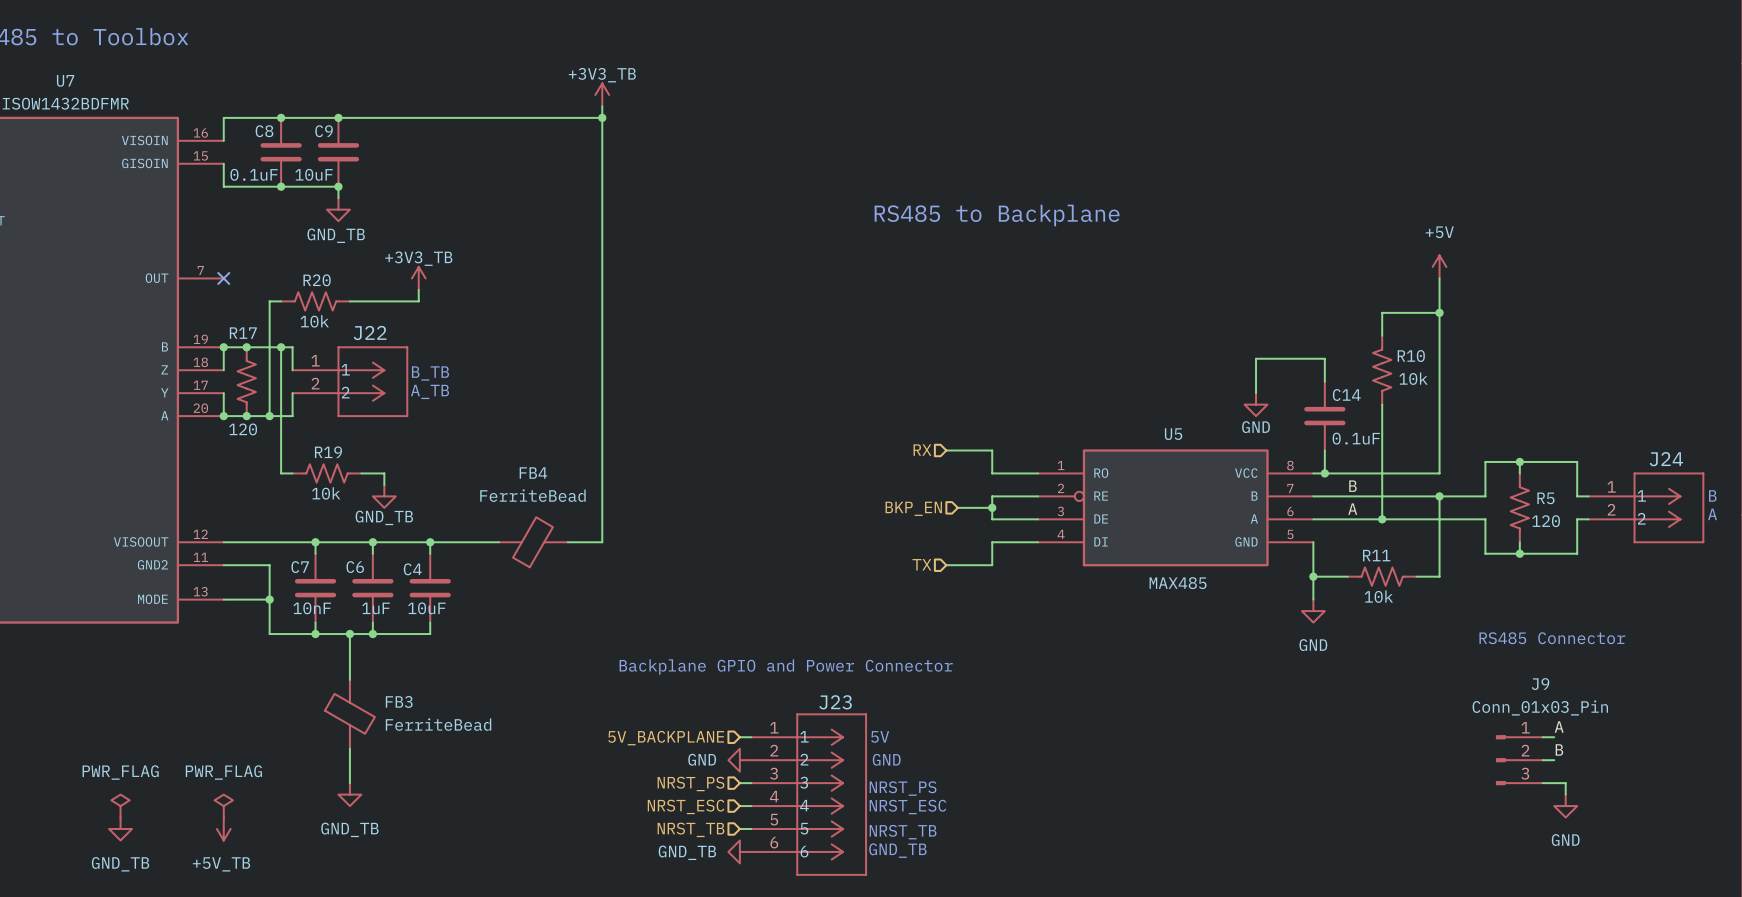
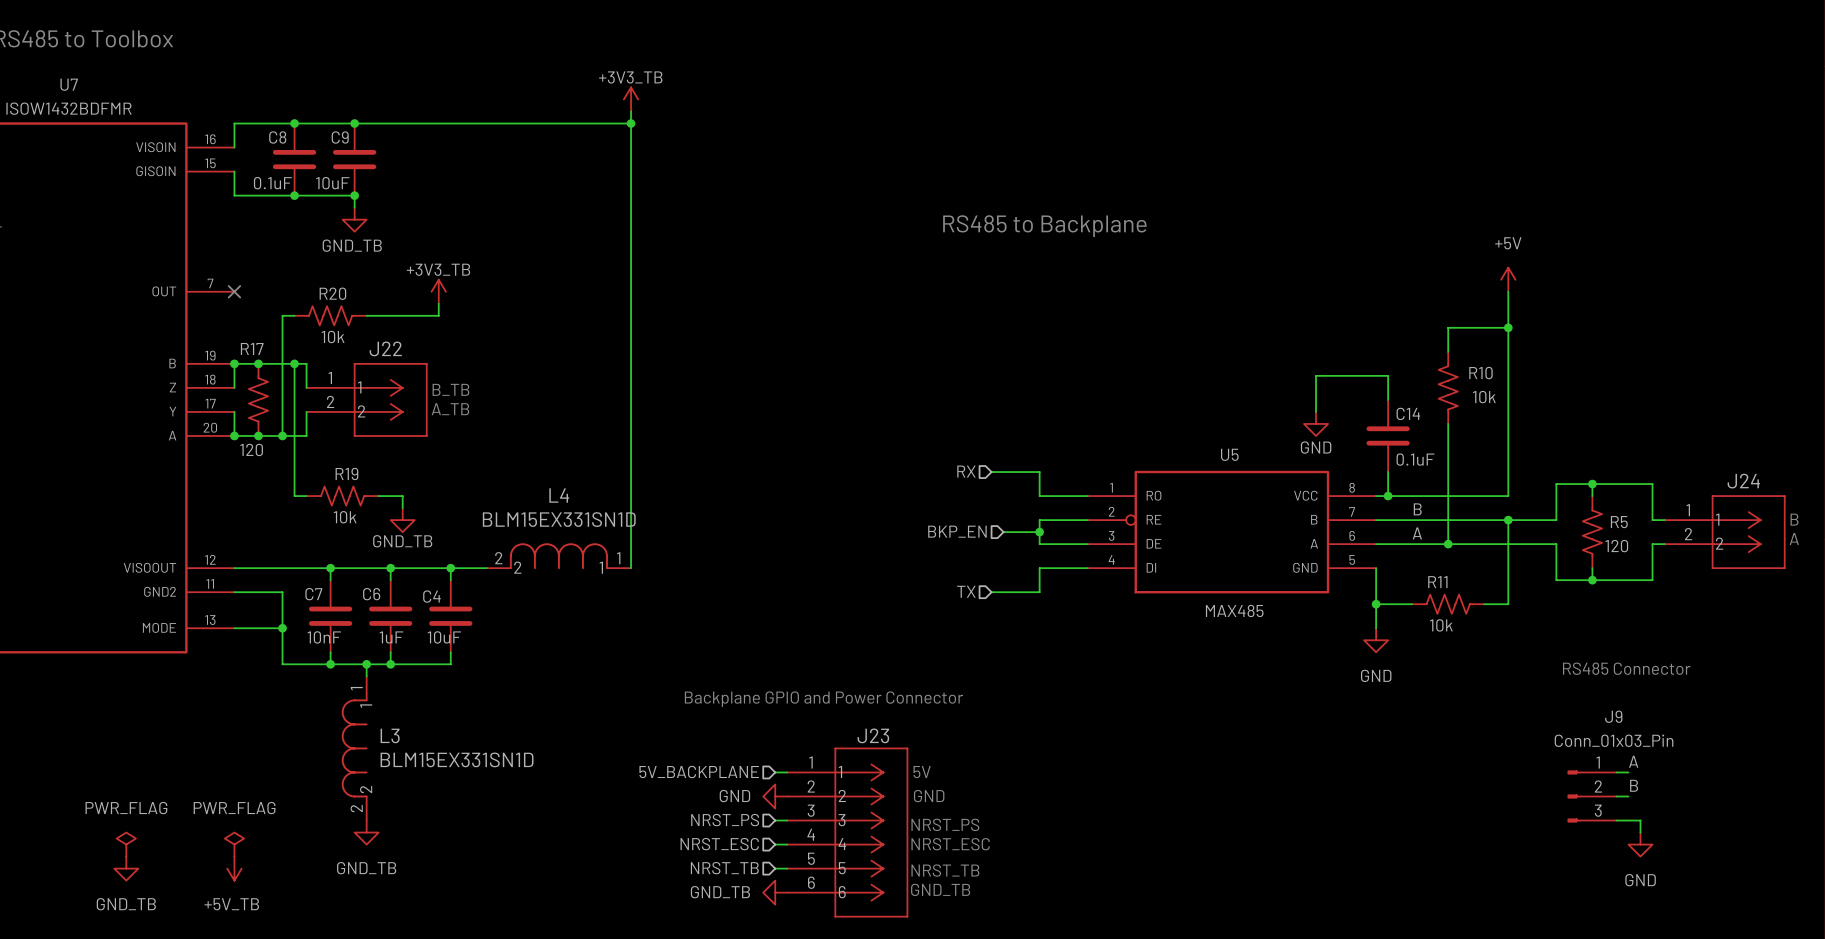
L4: none -> BLM15EX331SN1D (558, 556)
FB4: FerriteBead (533, 542) -> none
L3: none -> BLM15EX331SN1D (354, 748)
FB3: FerriteBead (349, 714) -> none

